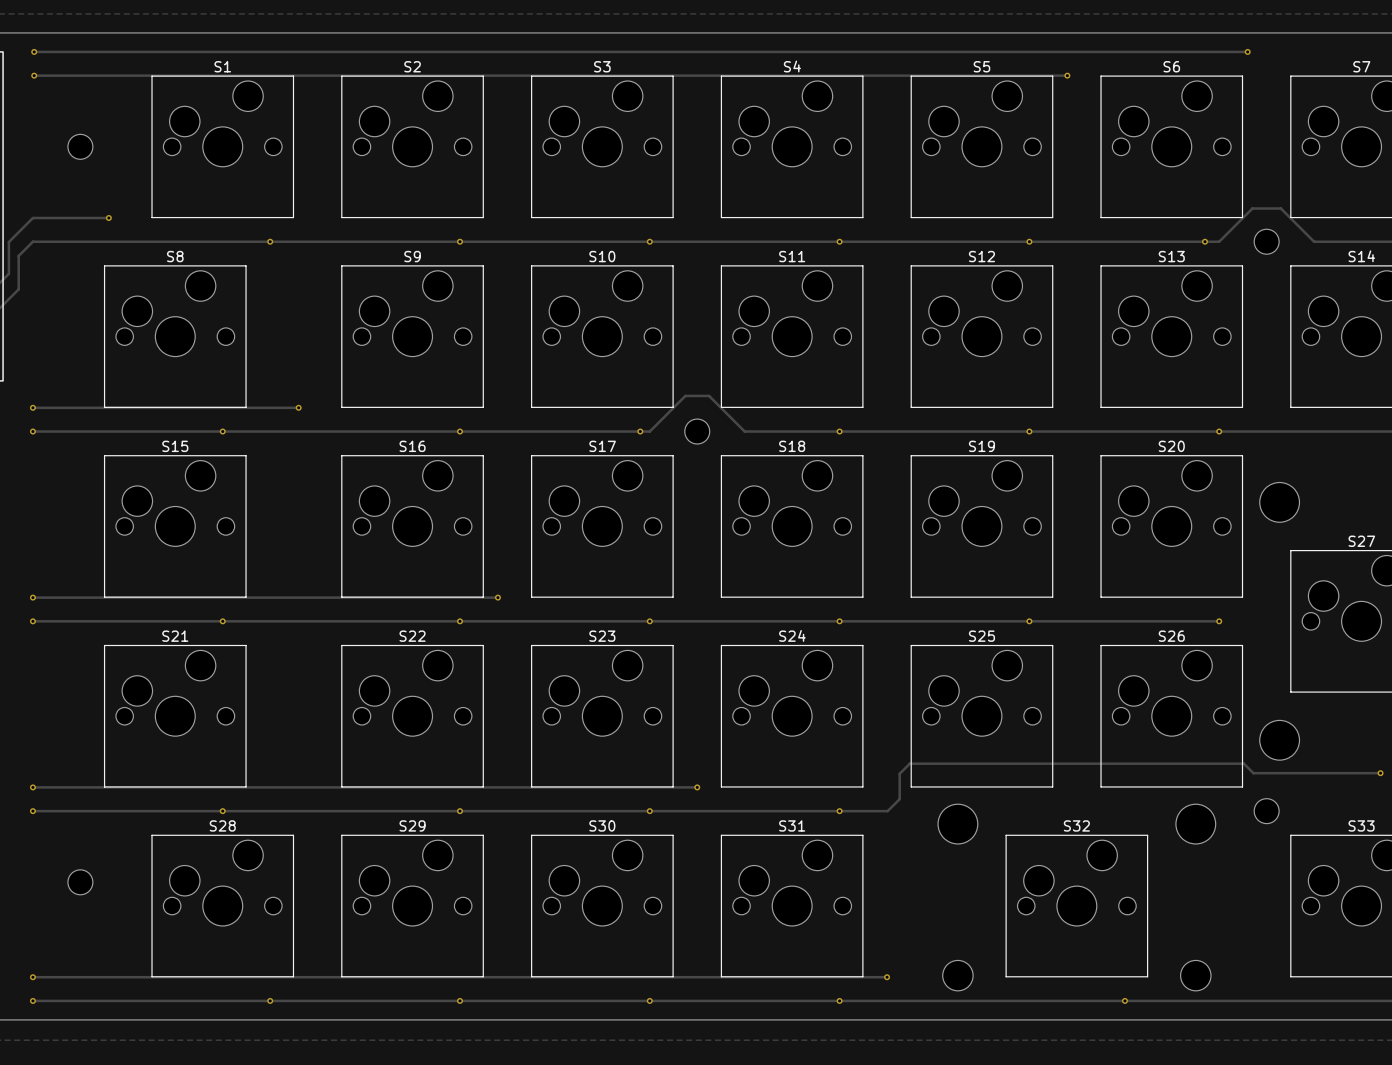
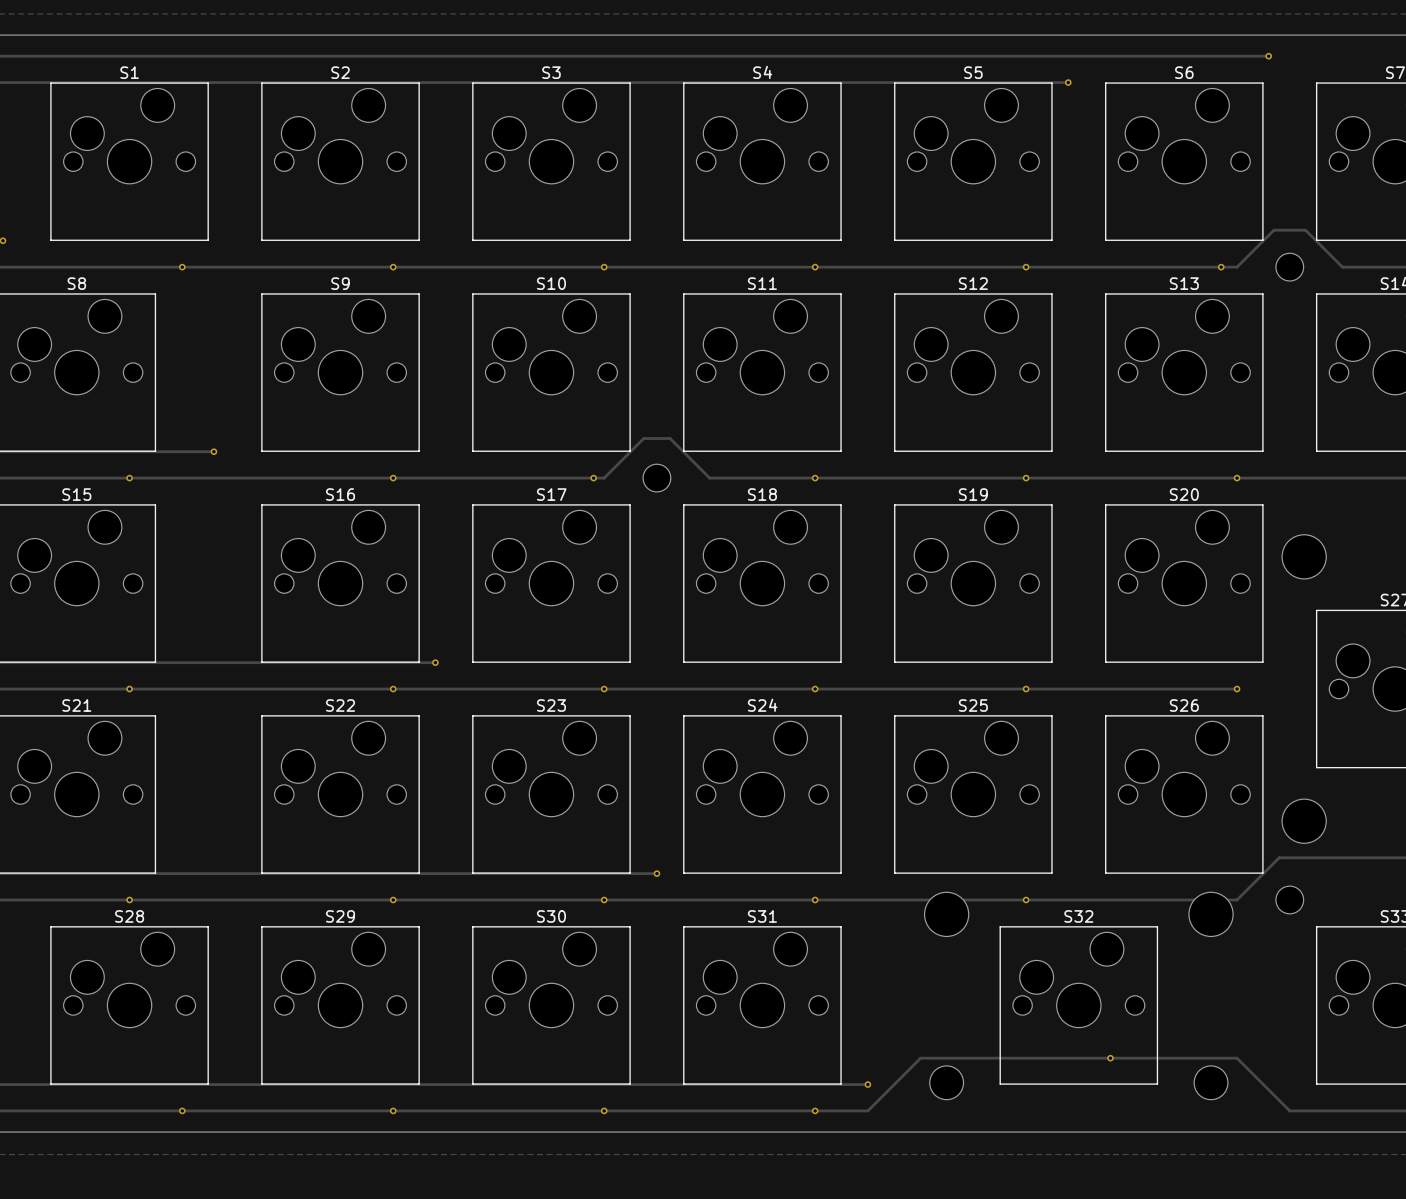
track: (1257, 773) (1253, 773) (1243, 763) (909, 763) (899, 773) (899, 799) (887, 811) -> (1279, 857) (1237, 899) (868, 899)
via: none -> (1026, 899)
track: (887, 1000) (1266, 1000) -> (867, 1110) (920, 1058) (1237, 1058) (1289, 1110)
via position: (1124, 1000) -> (1110, 1058)

